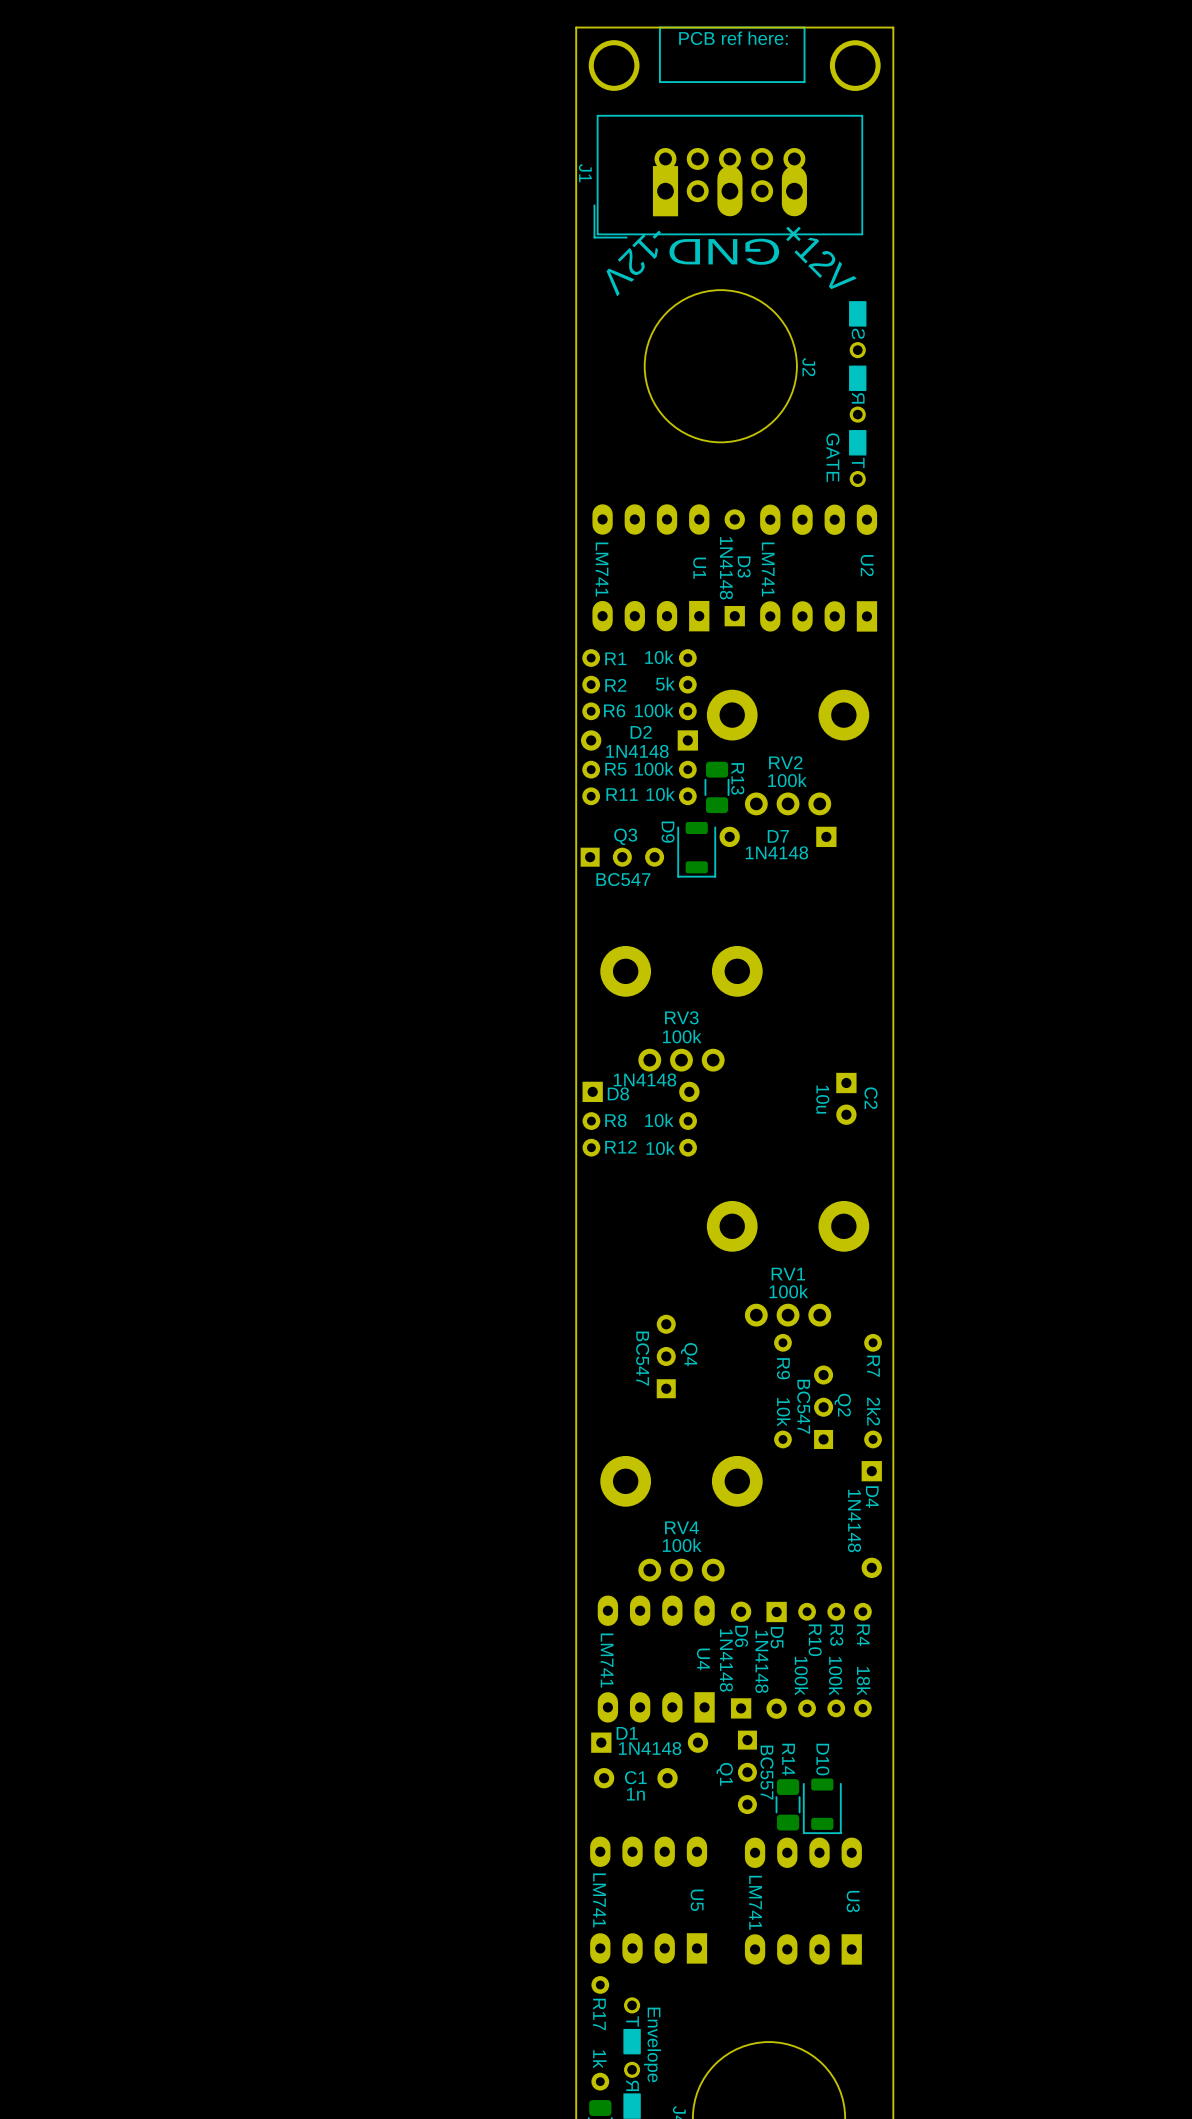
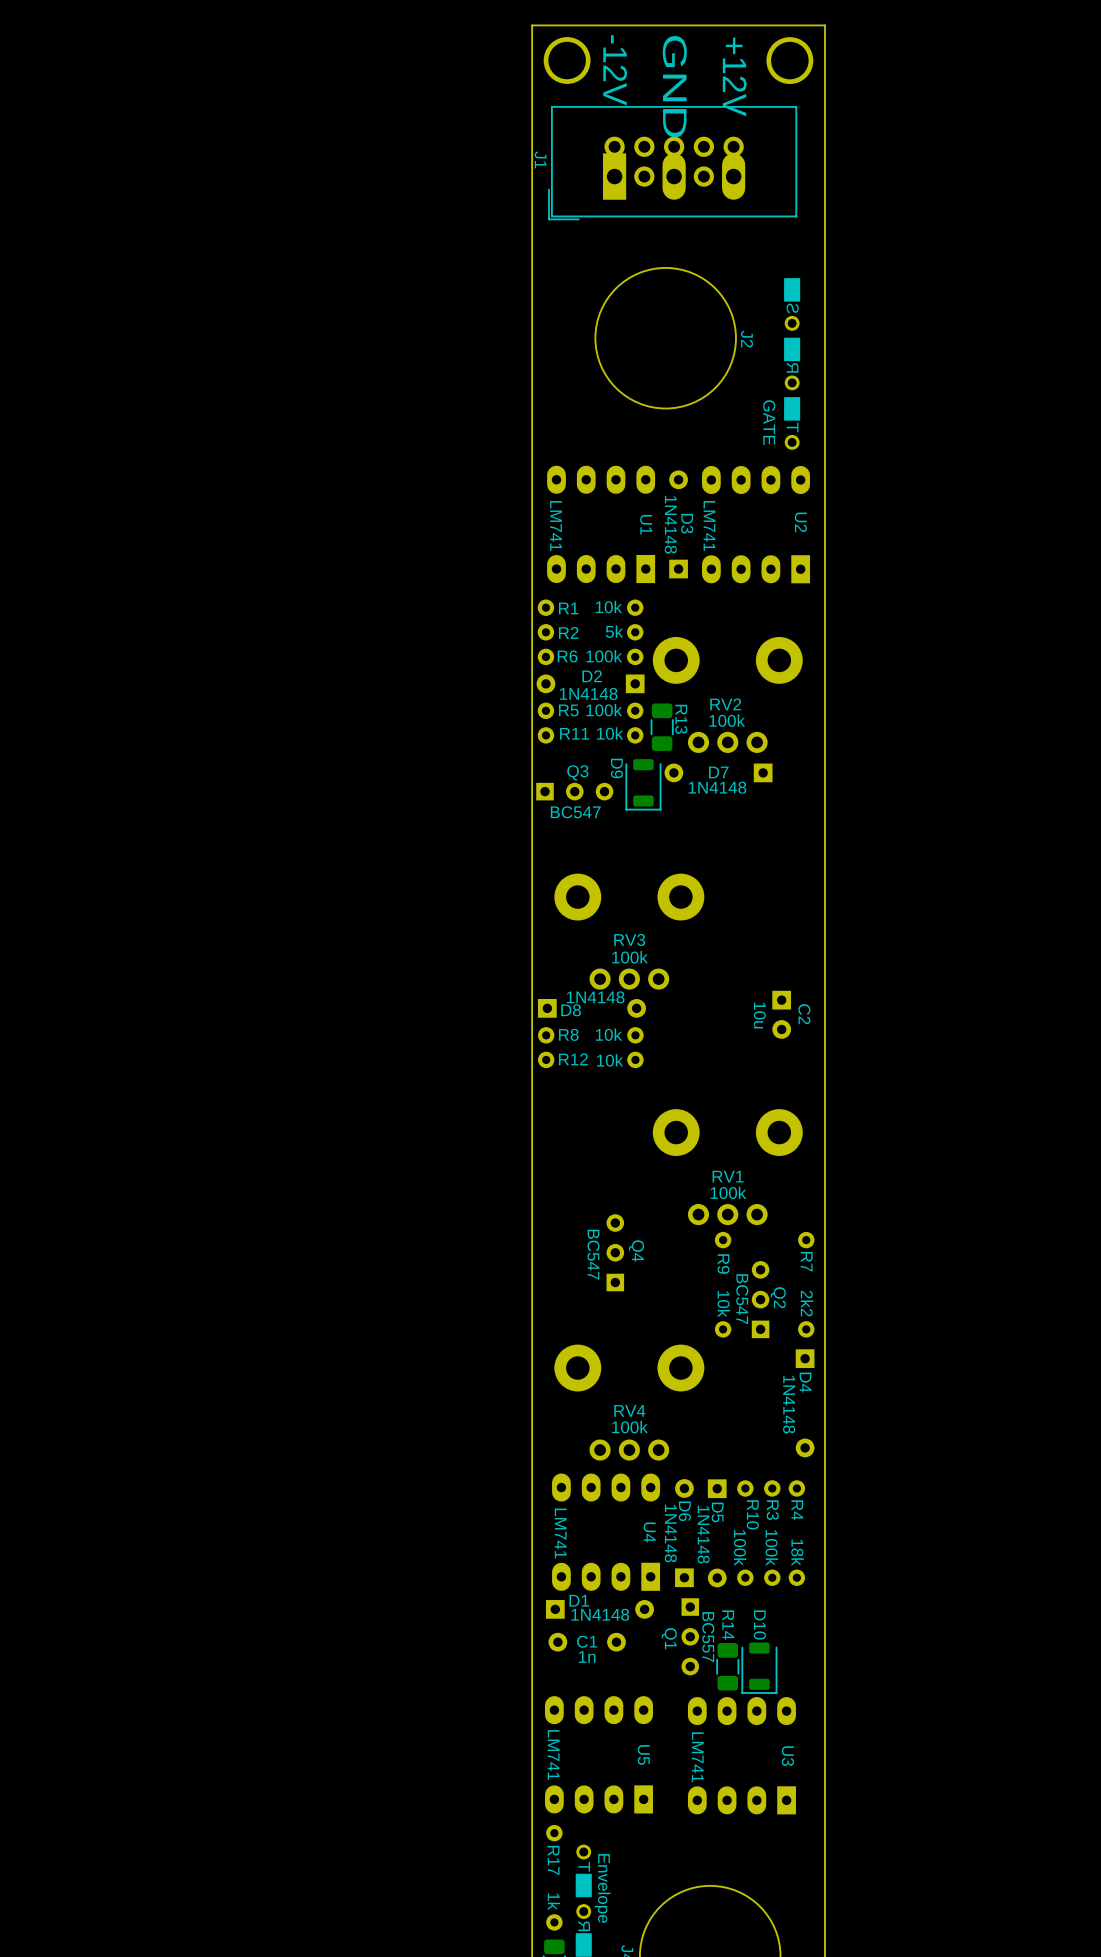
line: (804, 27) (804, 82) (659, 82) (659, 27) (804, 27) -> none
text: PCB ref here: (733, 38) -> GND (674, 86)
text: GND (724, 251) -> none
text rotation: 0° (821, 257) -> 45° clockwise (734, 76)
text position: +12V (821, 257) -> +12V (734, 76)
text rotation: 0° (633, 263) -> 45° counterclockwise (615, 70)
text position: -12V (633, 263) -> -12V (615, 70)

